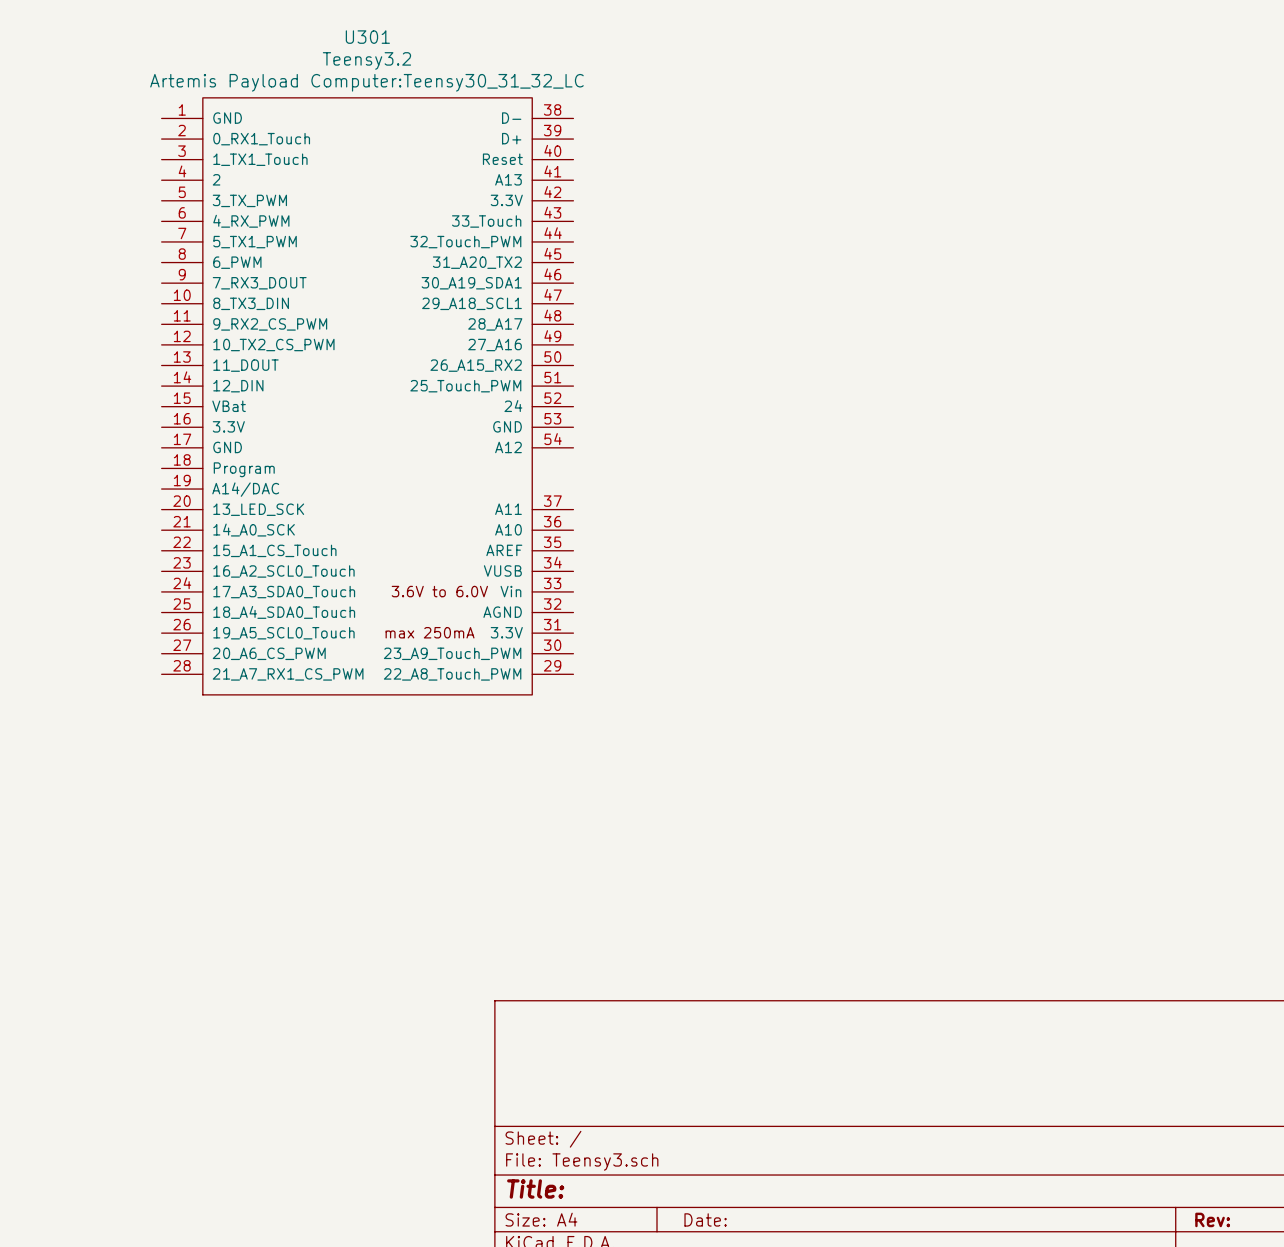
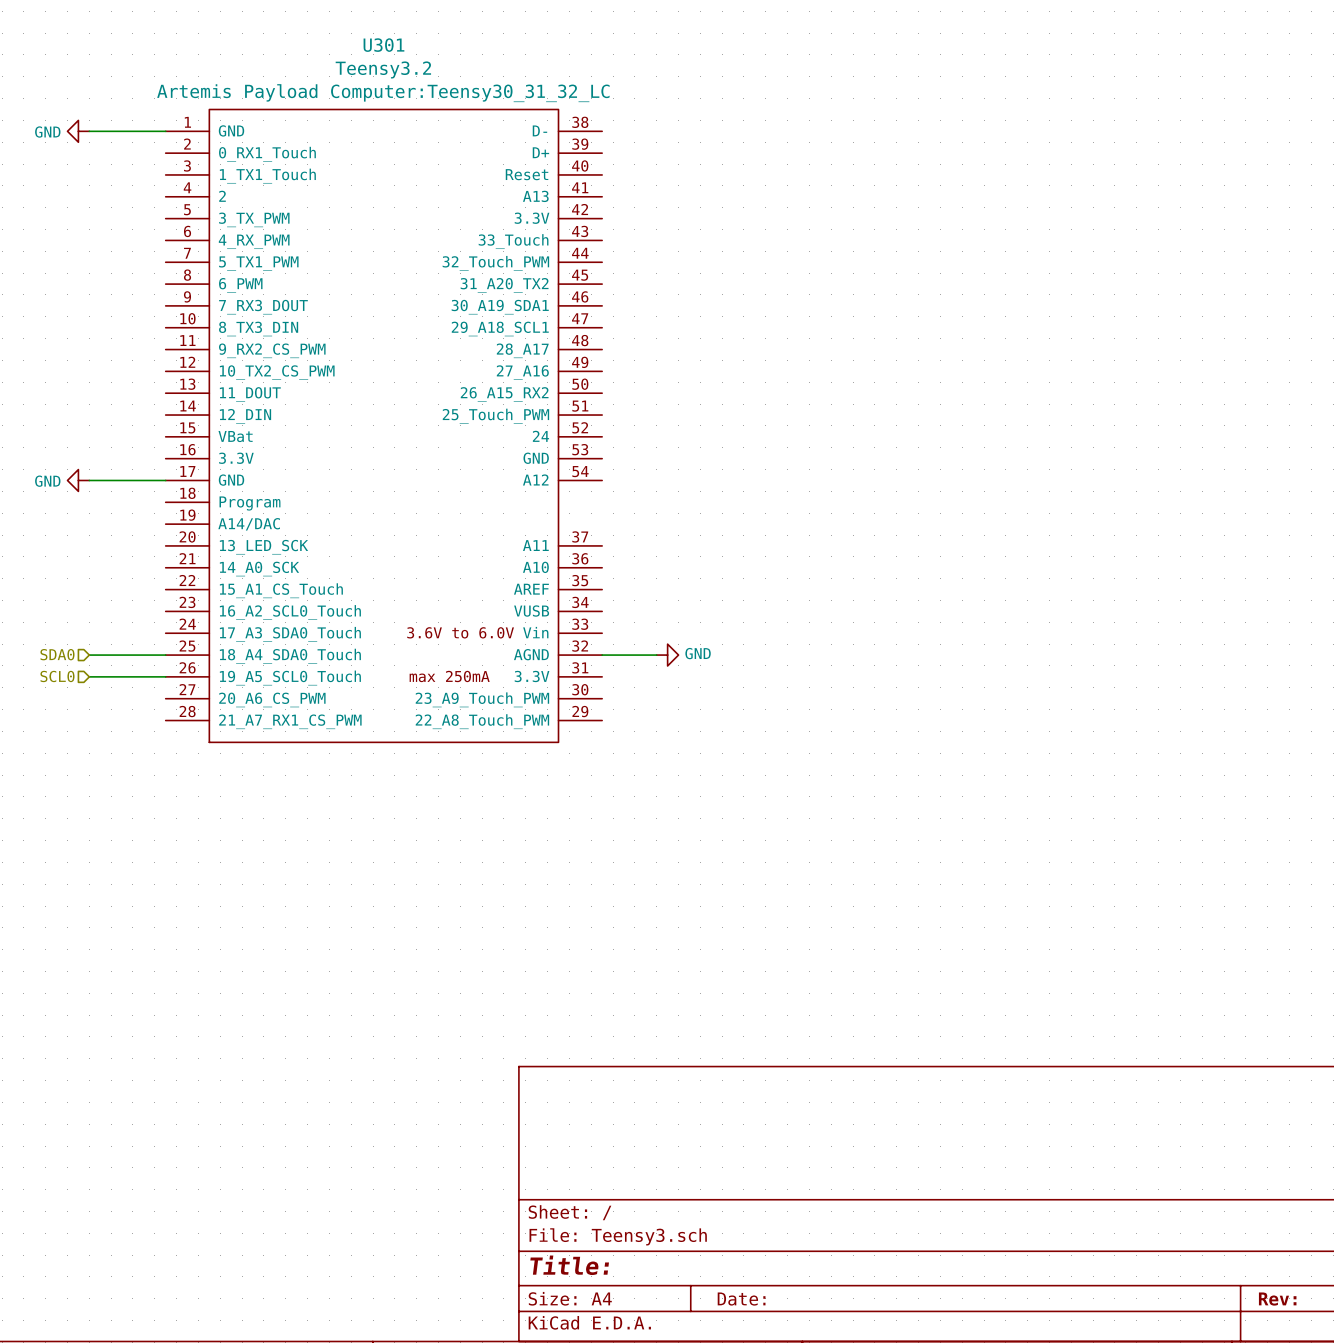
power symbol: none -> GND (78, 131)
wire: none -> (89, 131) (165, 131)
power symbol: none -> GND (78, 480)
wire: none -> (89, 480) (165, 480)
hierarchical label: none -> SDA0 (57, 654)
wire: none -> (89, 655) (165, 655)
wire: none -> (602, 655) (656, 655)
power symbol: none -> GND (667, 655)
hierarchical label: none -> SCL0 (57, 676)
wire: none -> (89, 676) (165, 676)

